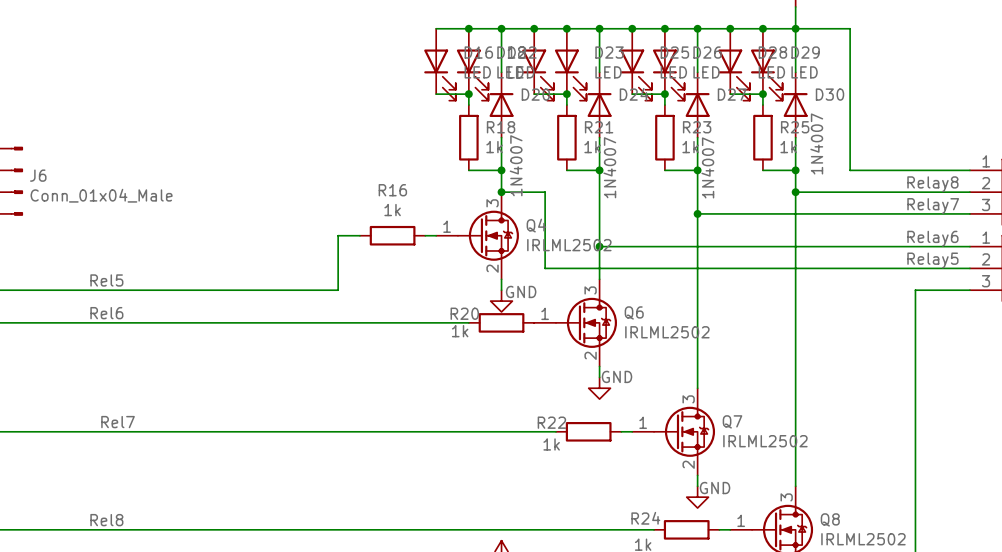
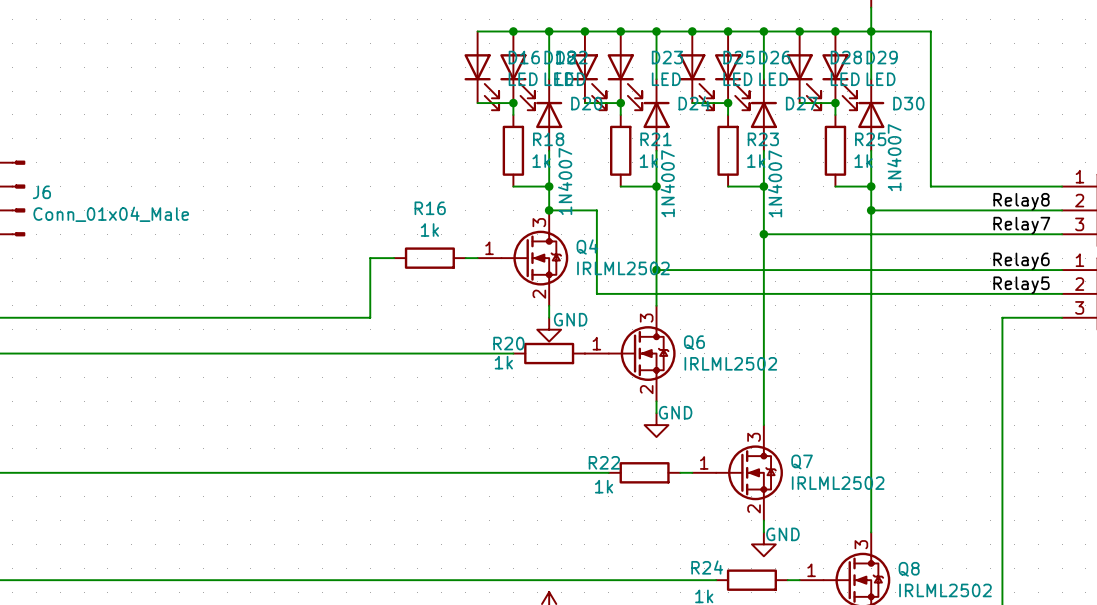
label: Rel5 (106, 280) -> none
label: Rel6 (106, 313) -> none
label: Rel7 (118, 422) -> none
label: Rel8 (106, 520) -> none

